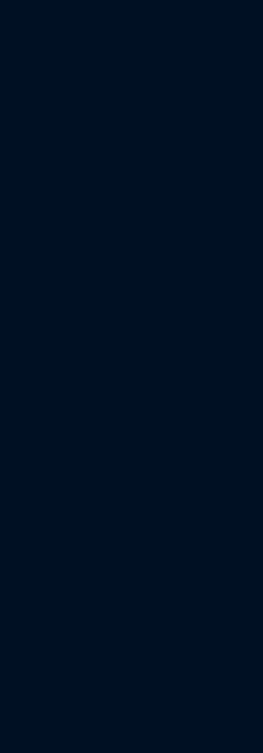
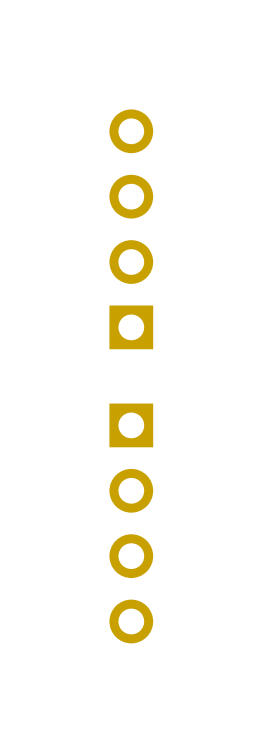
part: none -> (131, 229)
part: none -> (131, 523)

